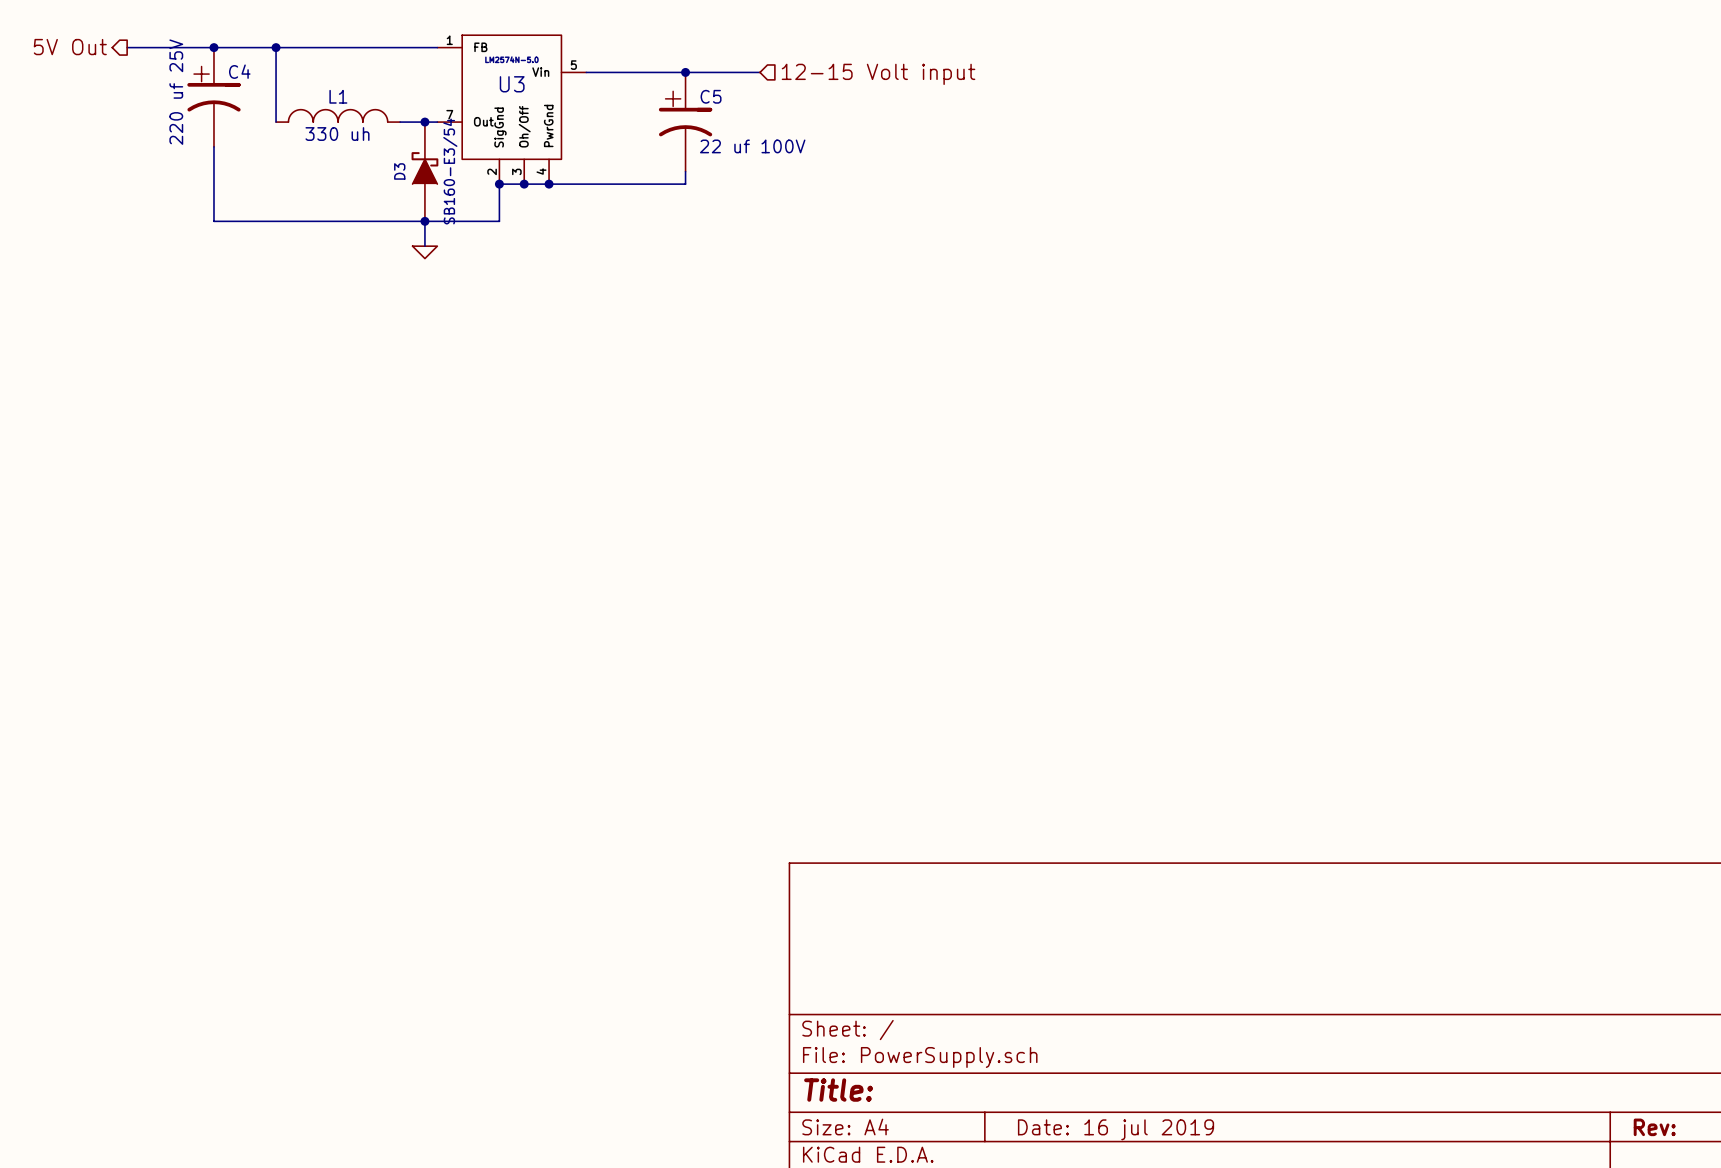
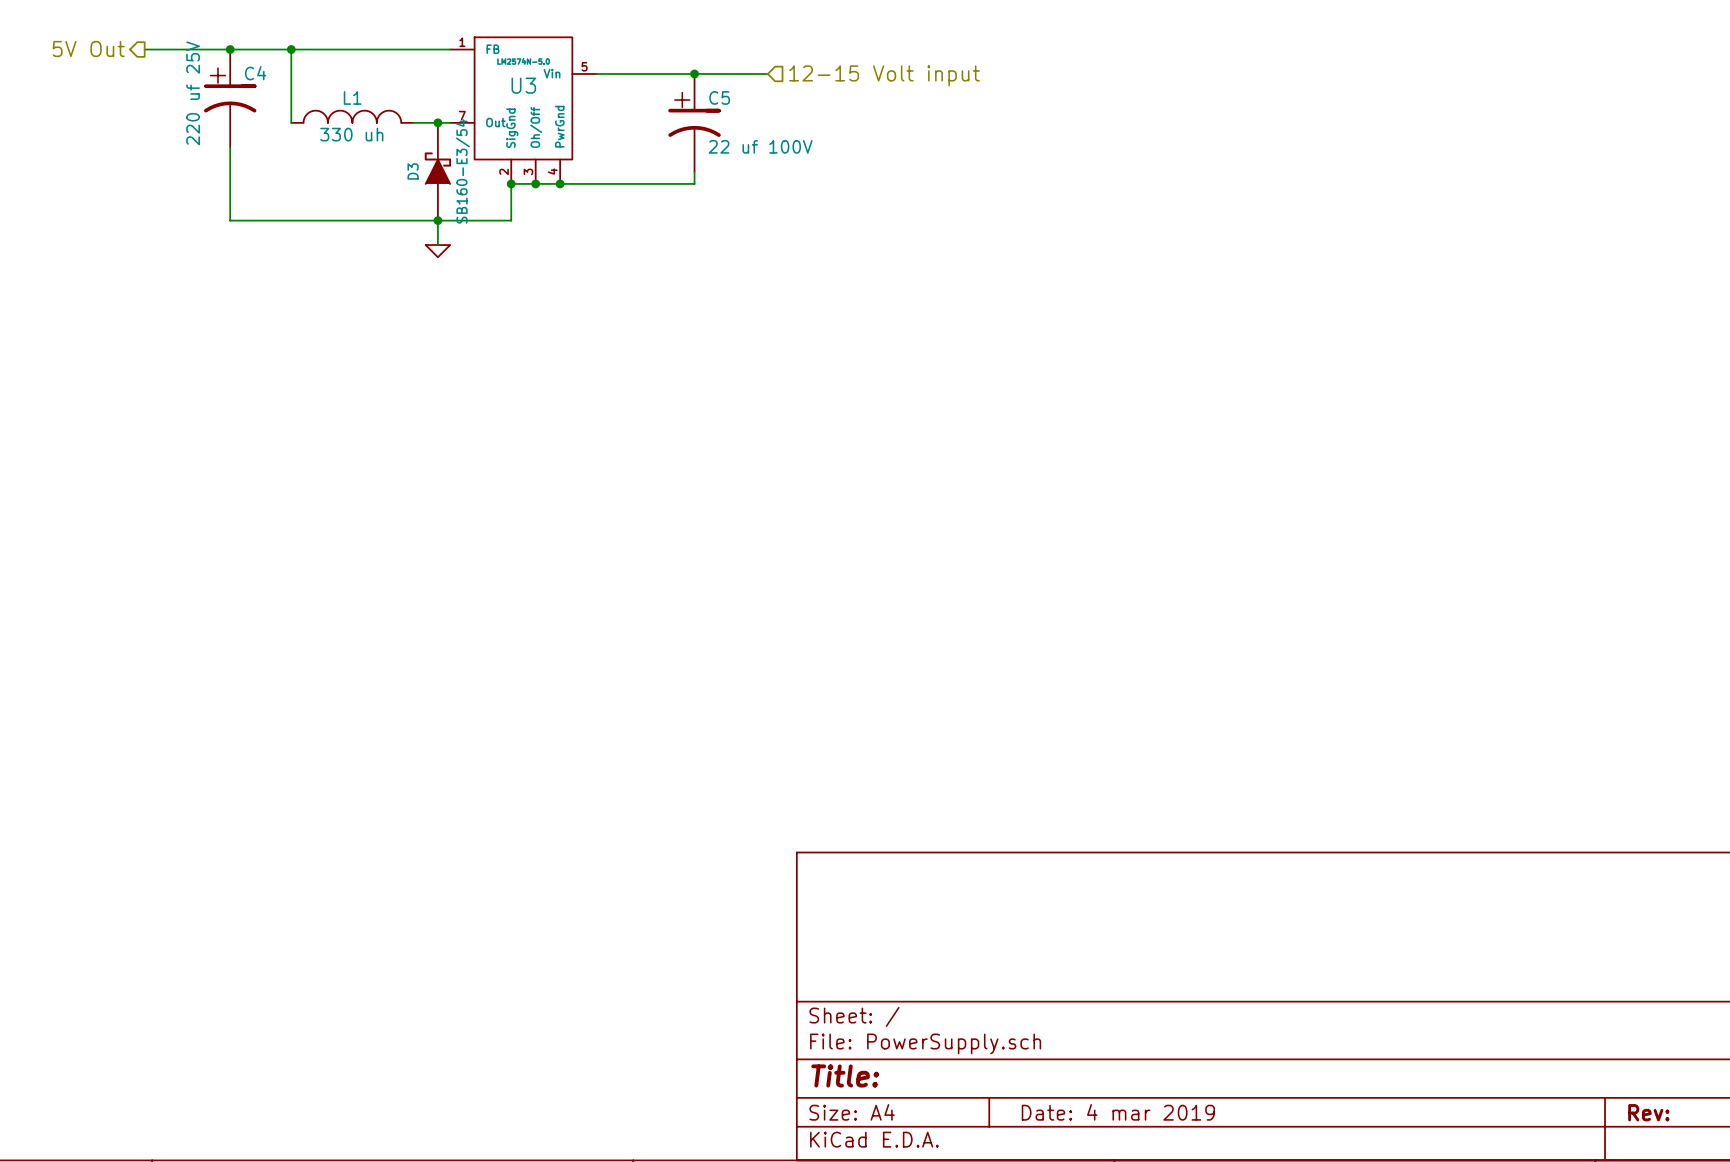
title block: Date: 16 jul 2019 (1116, 1129) -> Date: 4 mar 2019 (1118, 1112)

